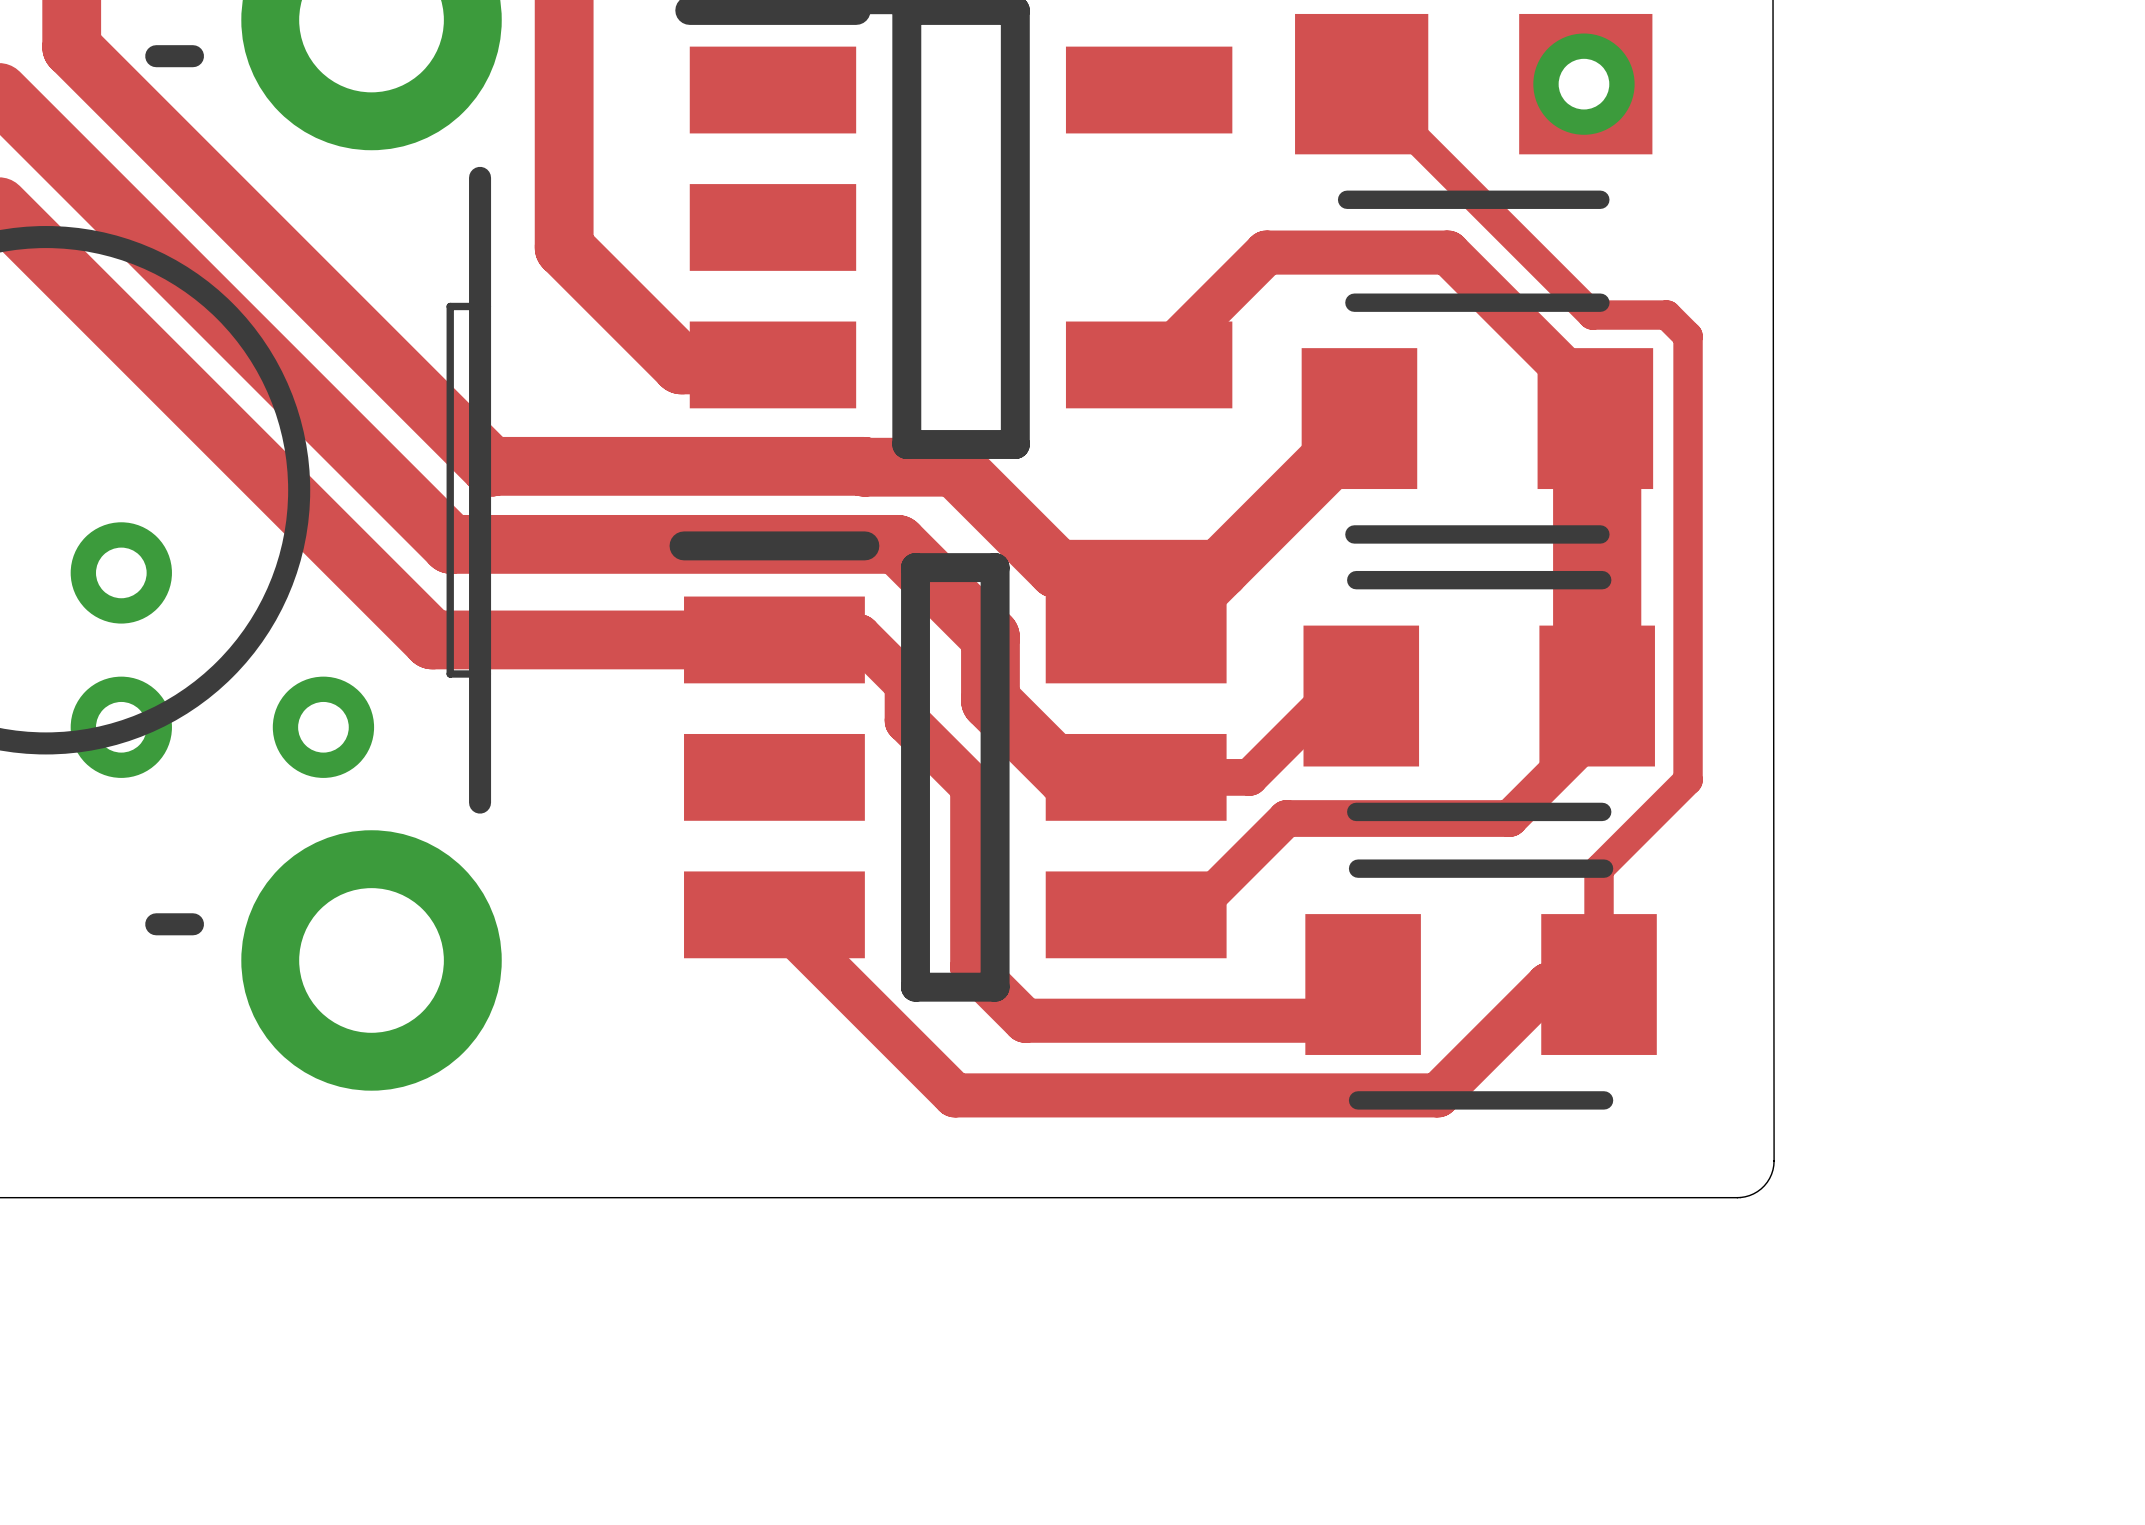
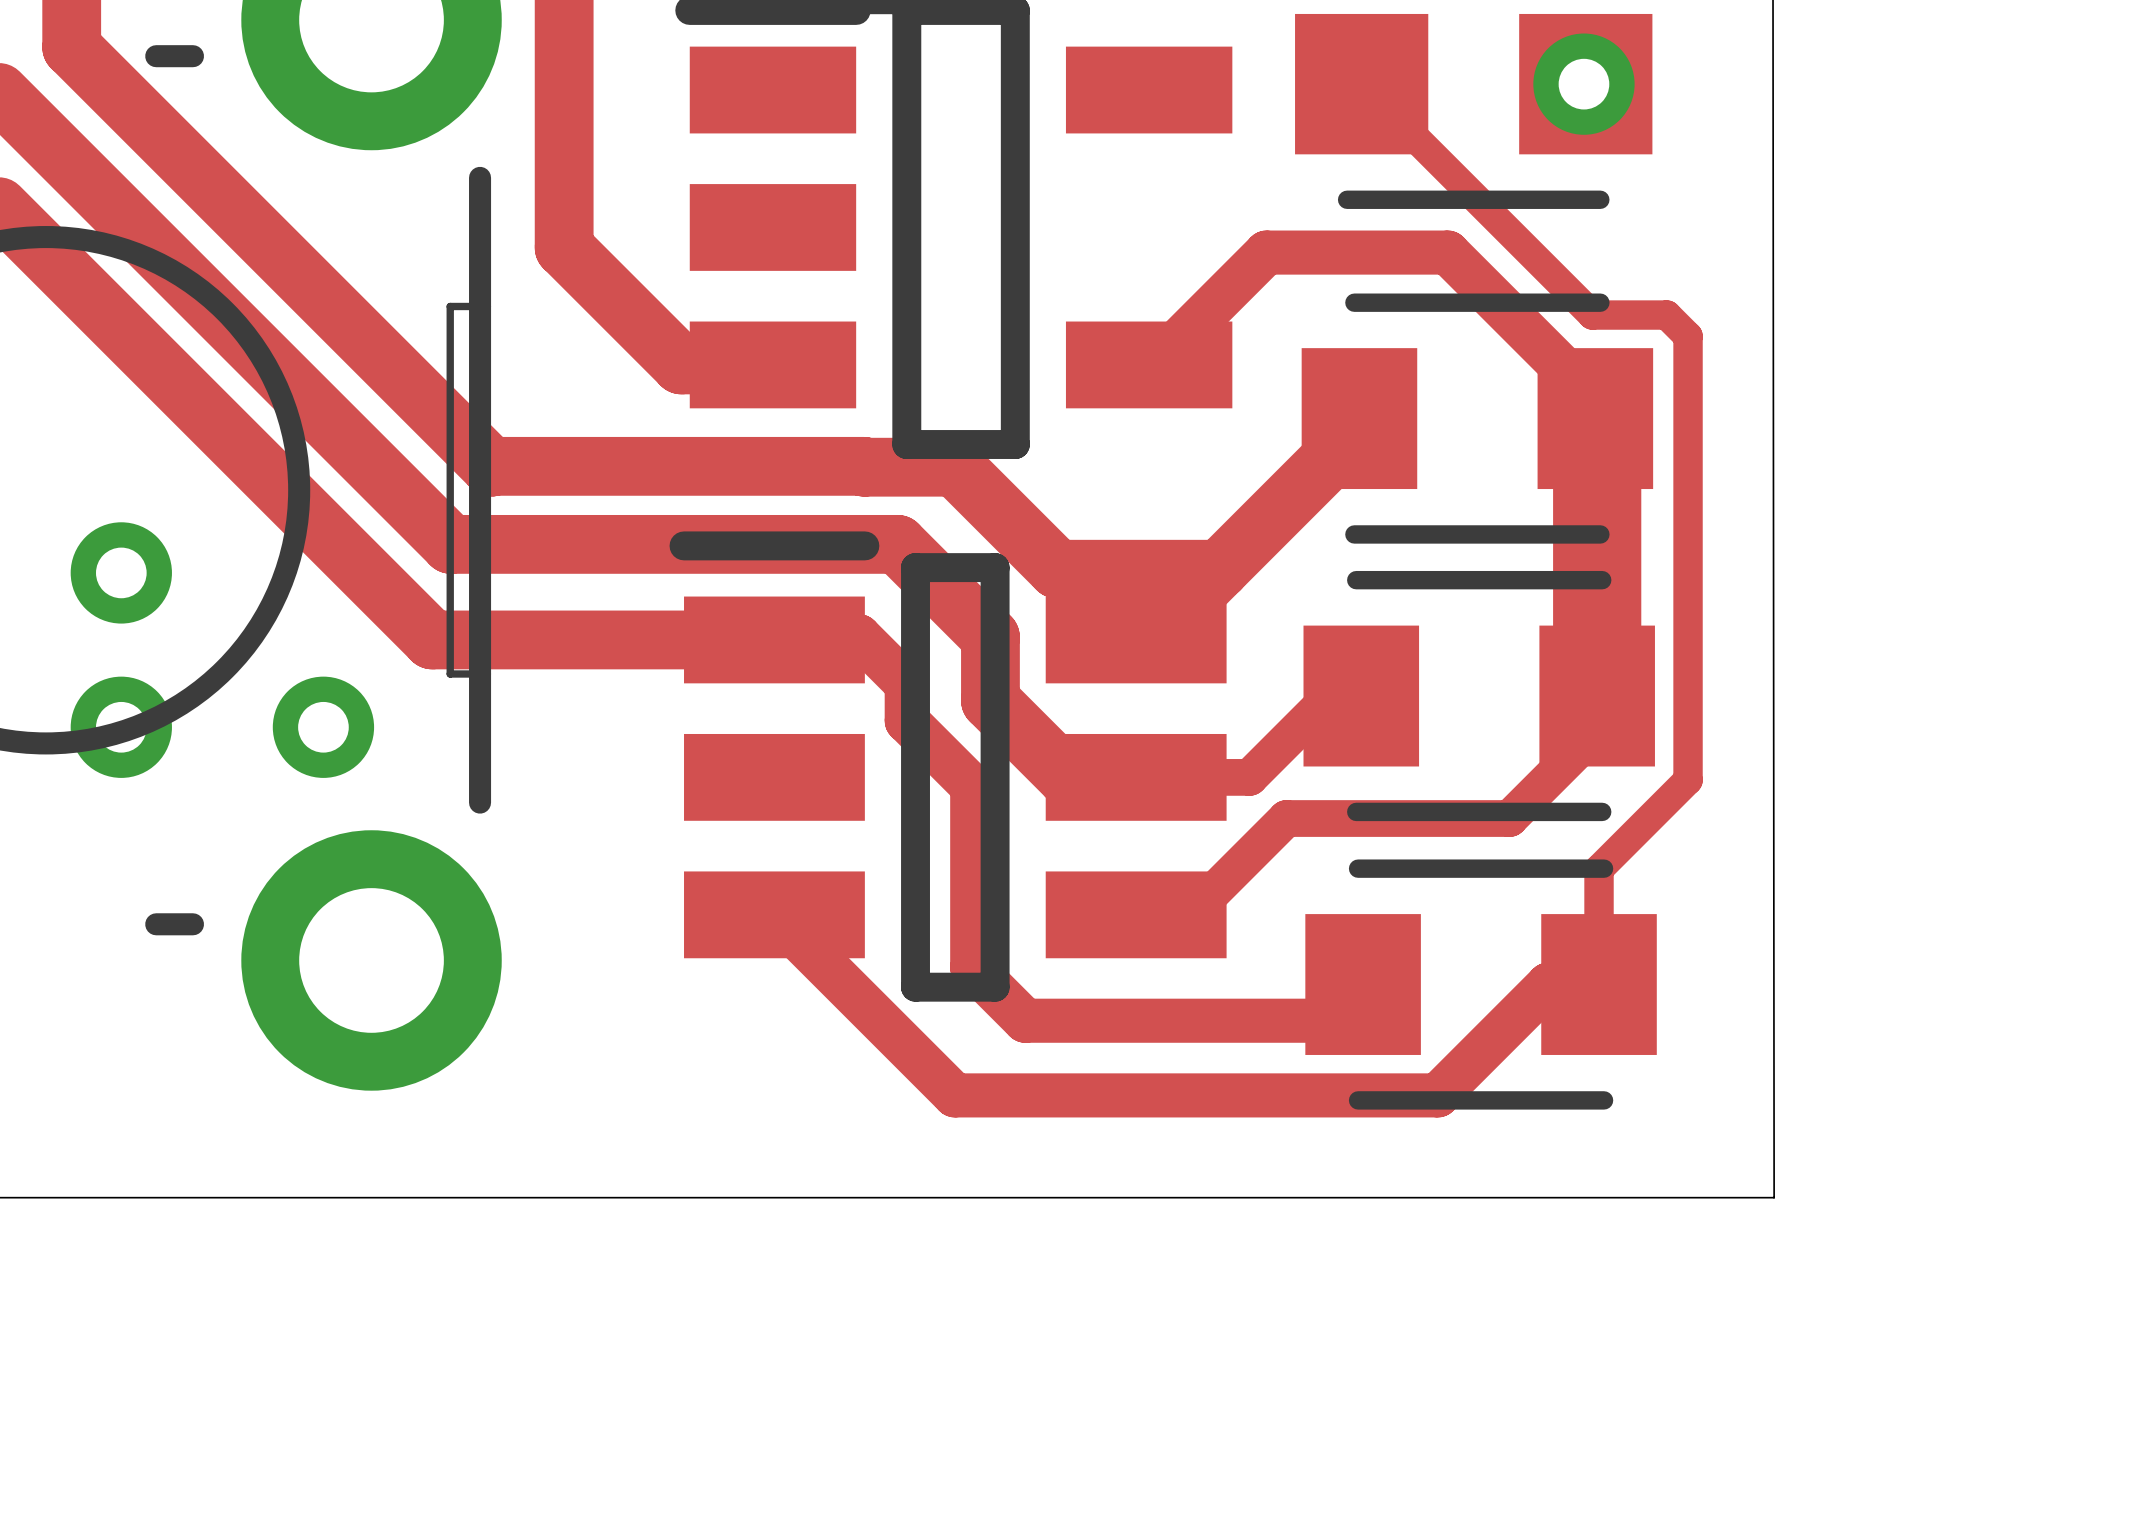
board edge: (1774, 1160) (1771, 1174) (1764, 1185) (1753, 1193) (1737, 1197) -> (1774, 1160) (1774, 1197) (1737, 1197)

